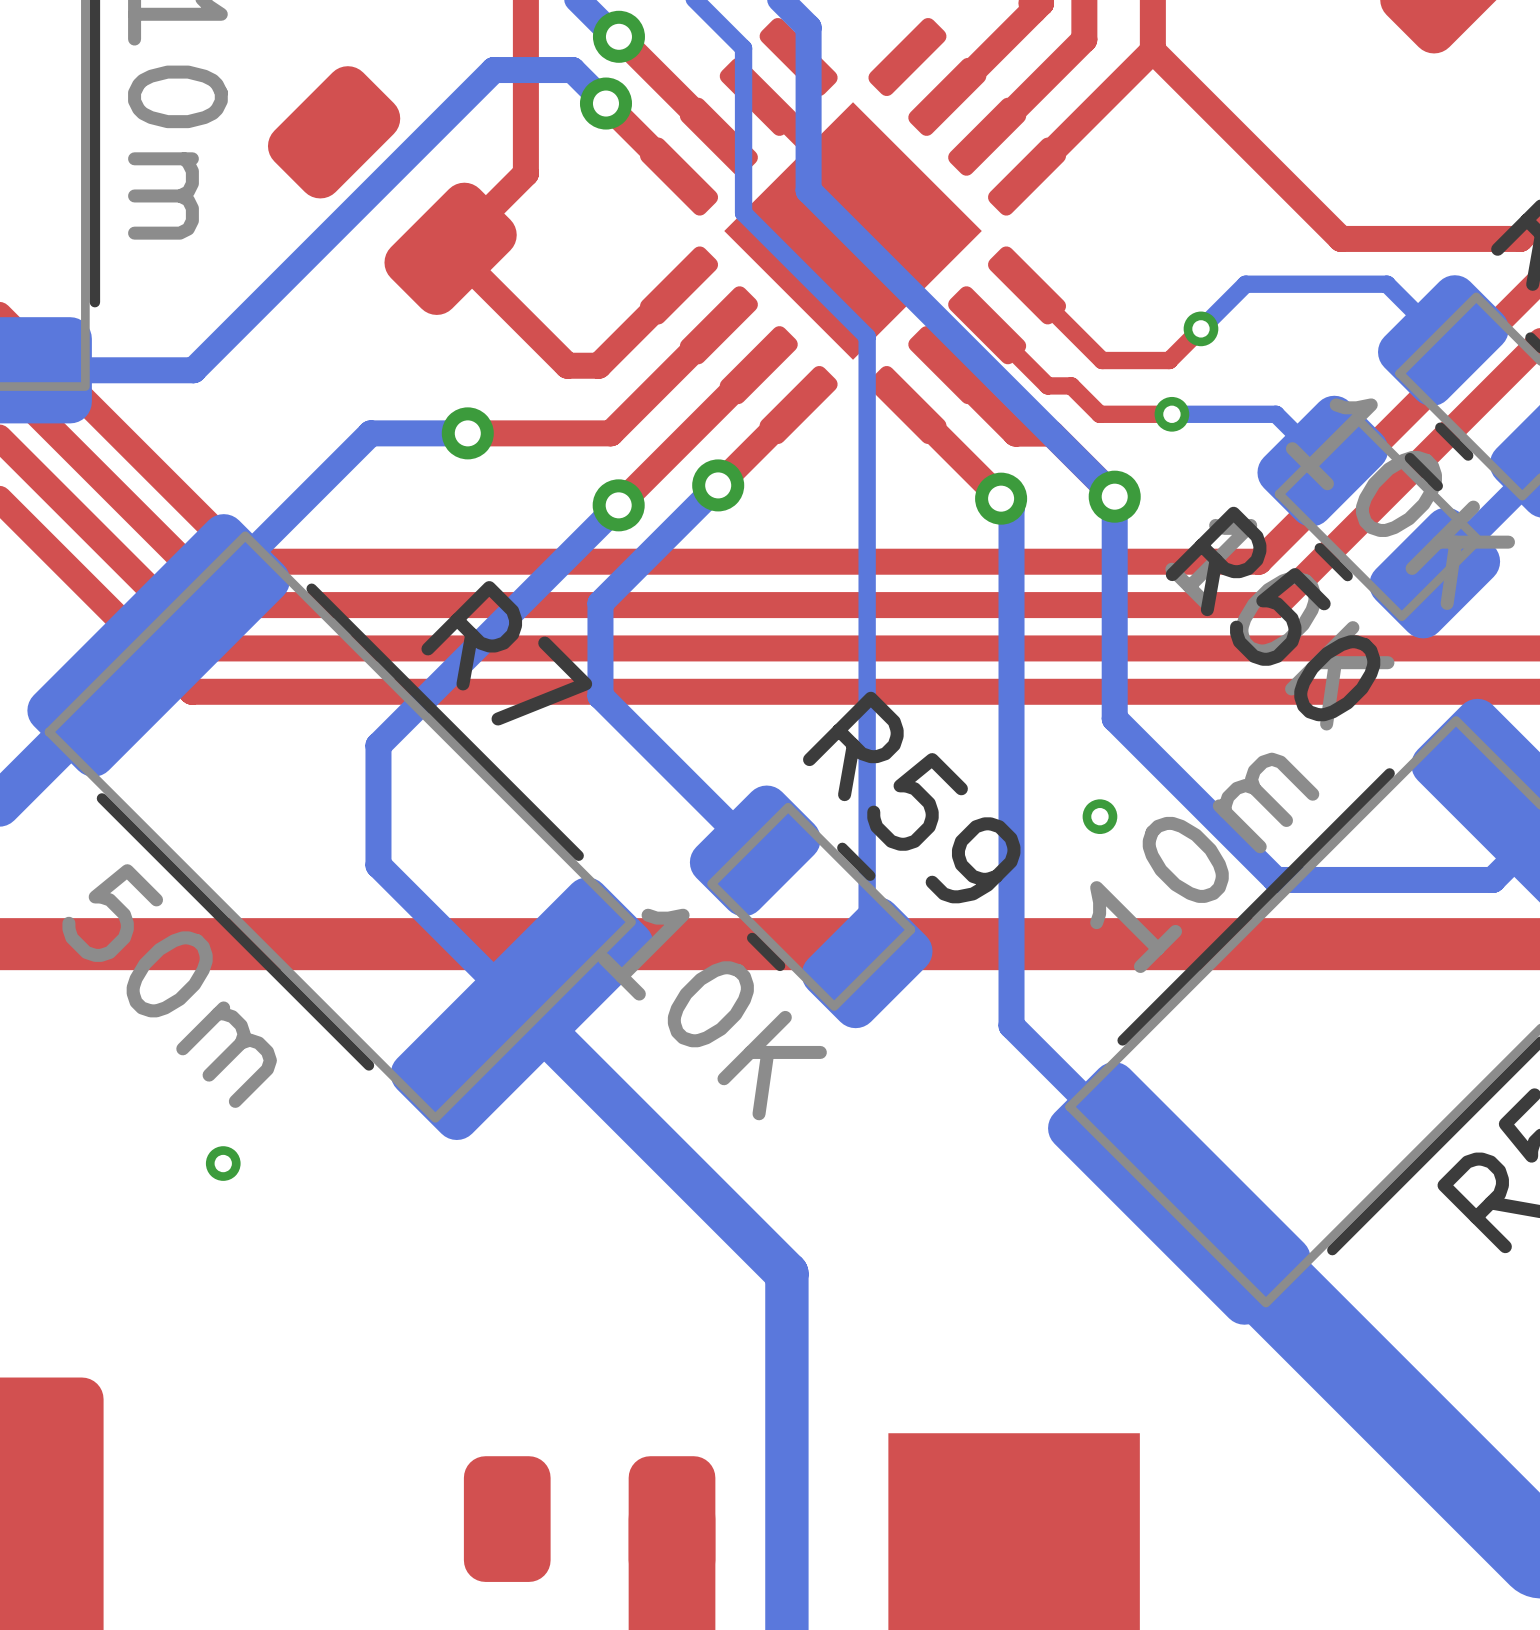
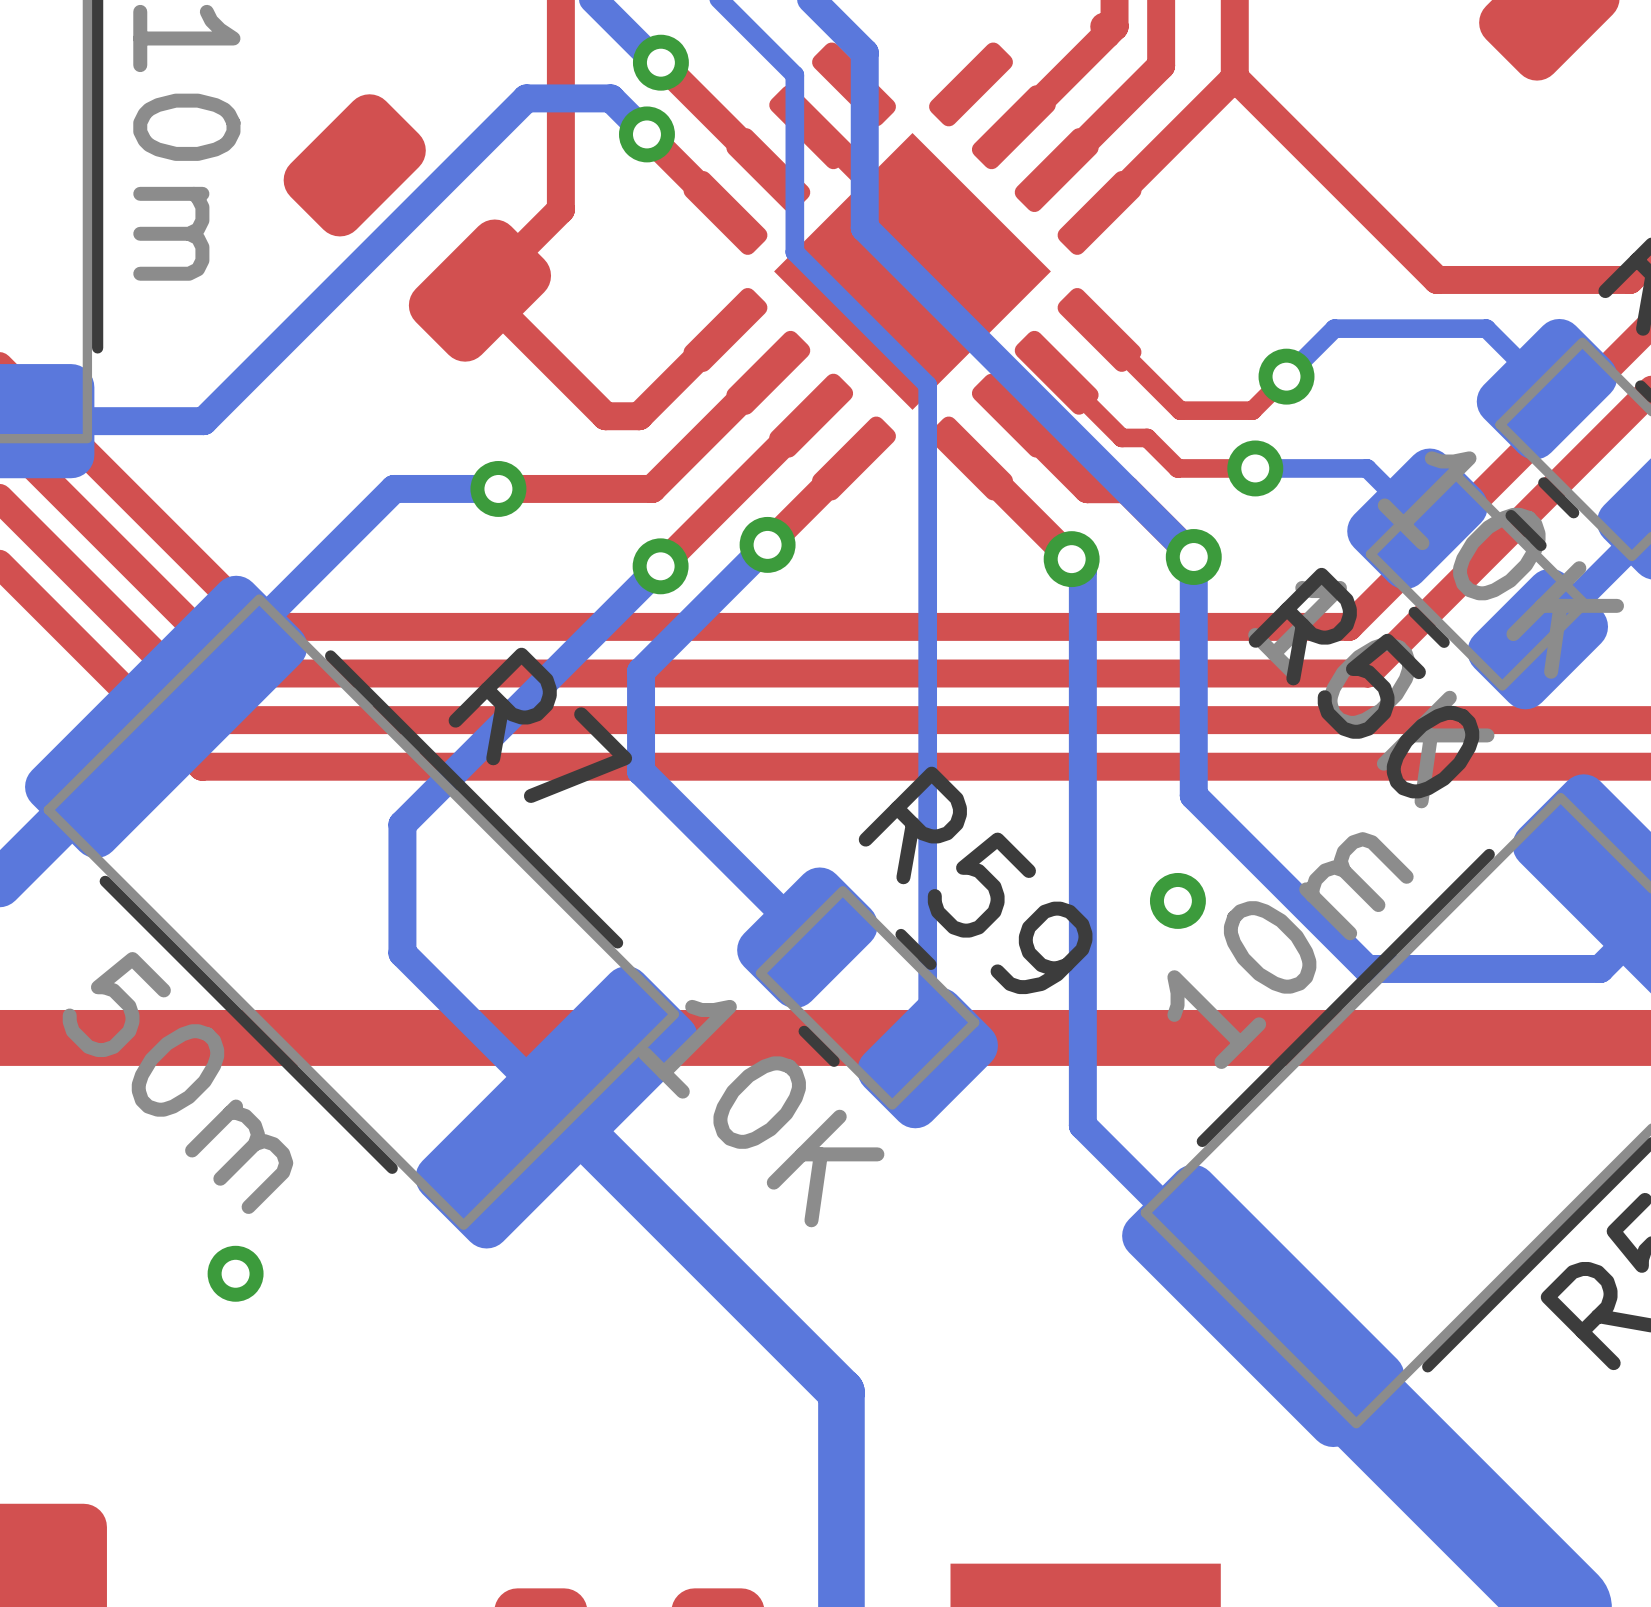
via size: [1183, 311, 1219, 347] -> [1258, 348, 1315, 405]
via size: [1154, 396, 1190, 432] -> [1227, 440, 1284, 497]
via size: [1082, 799, 1118, 835] -> [1149, 872, 1206, 929]
via size: [205, 1146, 241, 1181] -> [207, 1245, 264, 1302]

